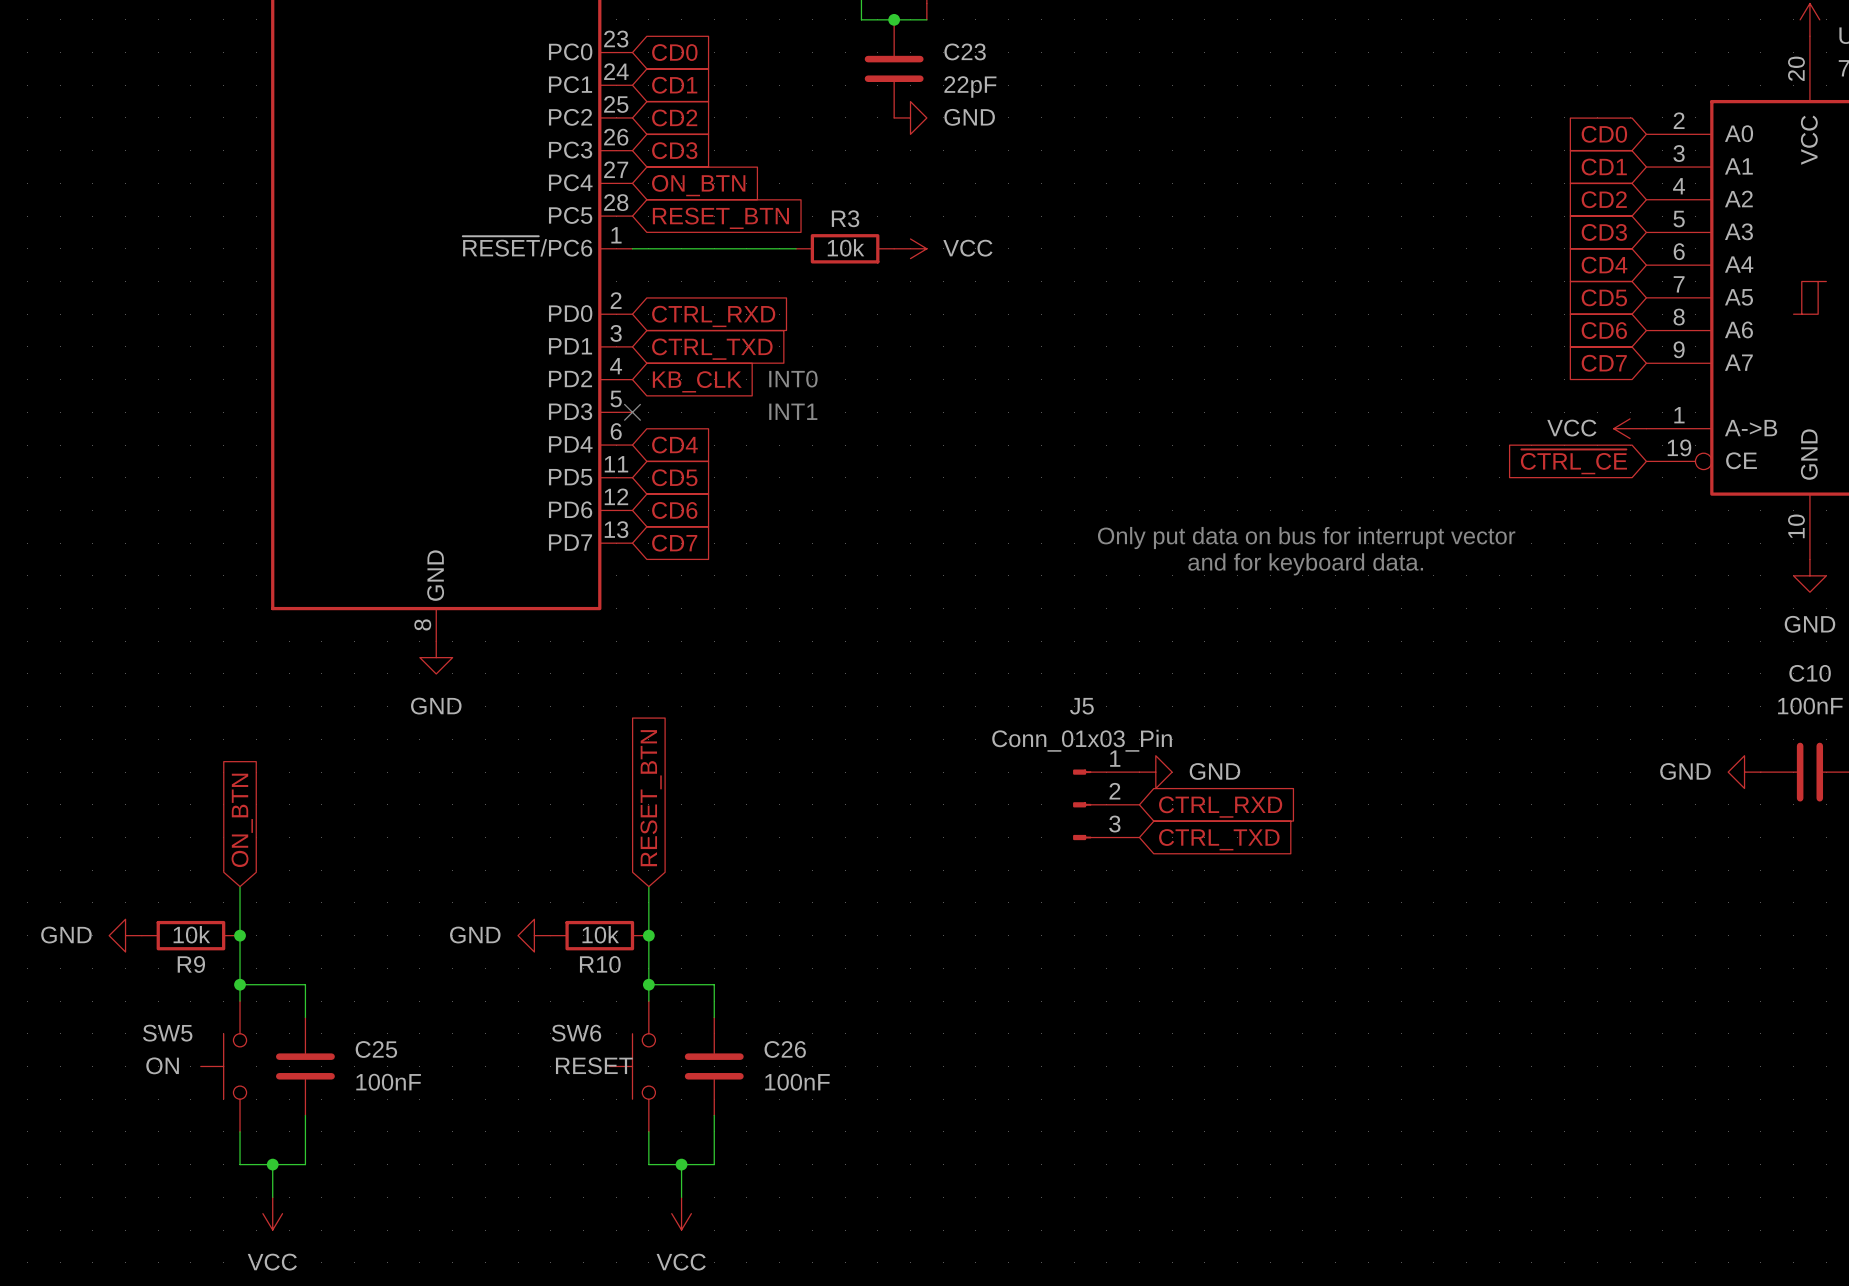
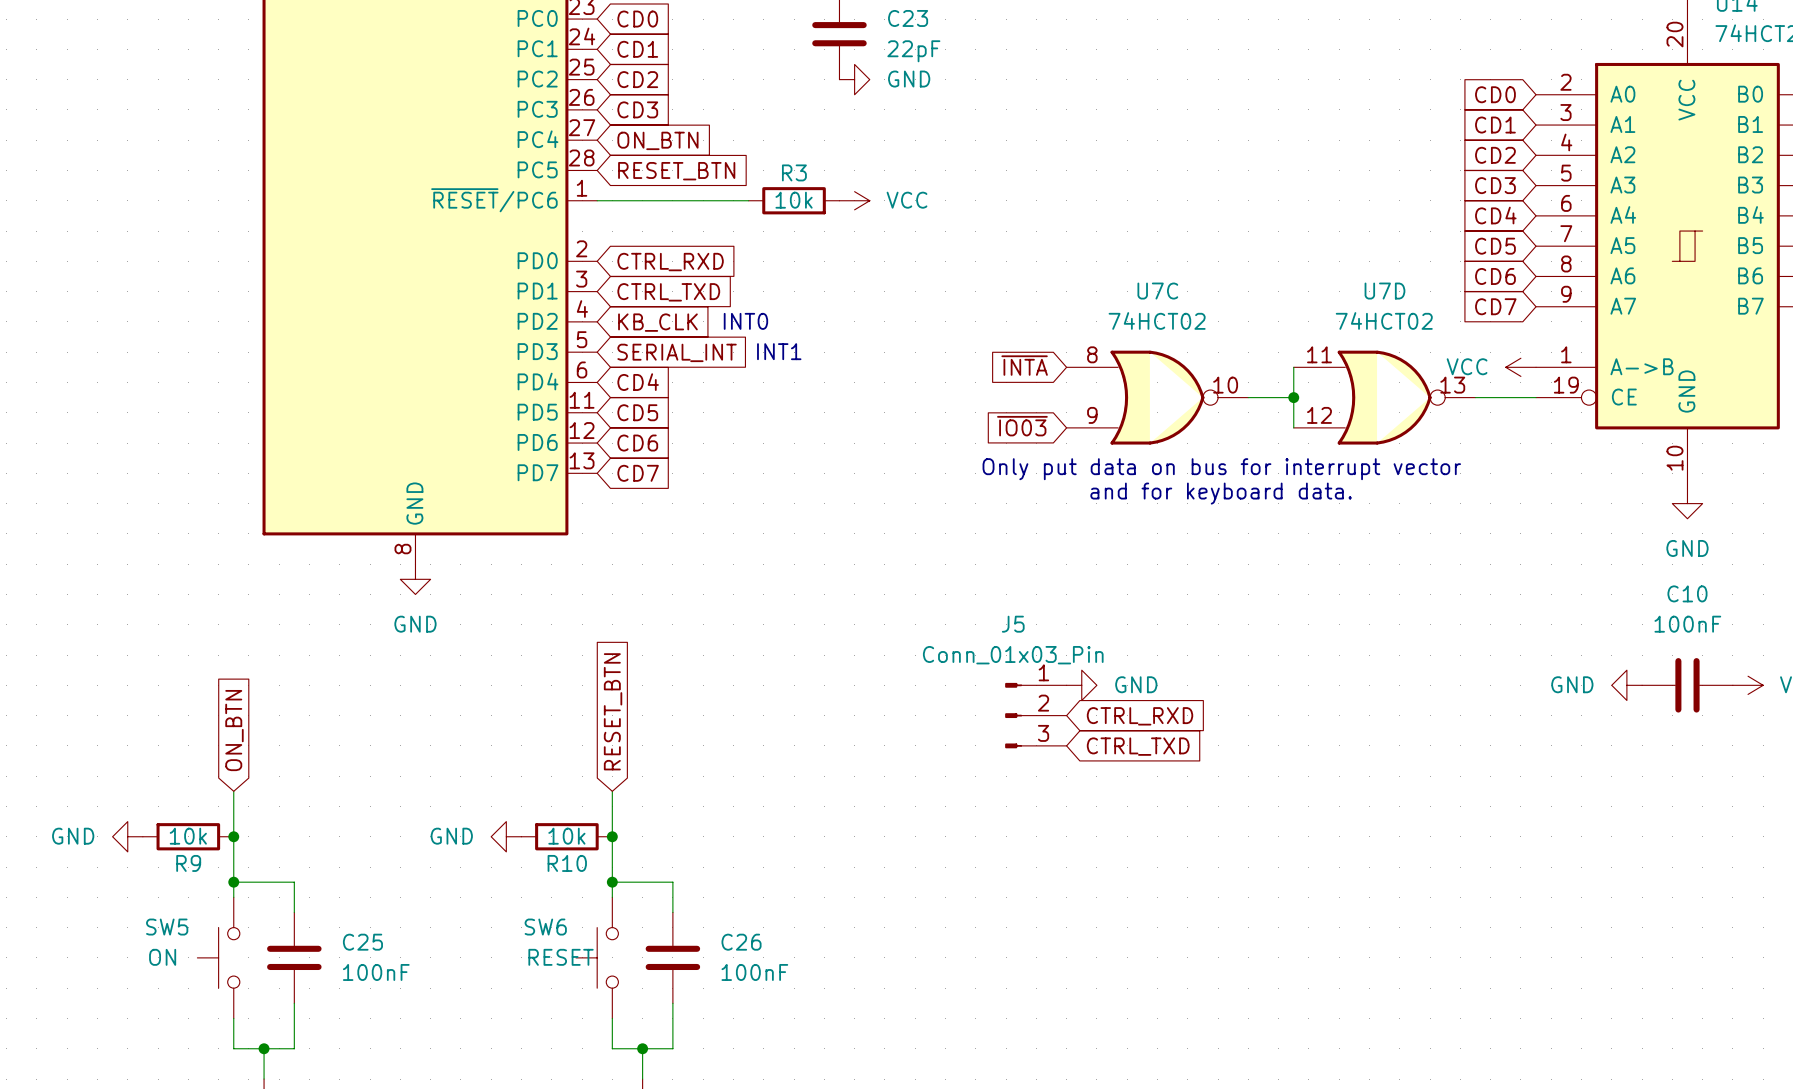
text position: INT1 (793, 411) -> INT1 (779, 351)
no-connect mark: (632, 412) -> none
global label: none -> SERIAL_INT (677, 352)
global label: none -> ~{INTA} (1024, 365)
wire: none -> (1293, 367) (1293, 427)
U7C: none -> 74HCT02 (1157, 397)
wire: none -> (1248, 397) (1293, 397)
junction: none -> (1293, 397)
U7D: none -> 74HCT02 (1384, 397)
global label: ~{CTRL_CE} (1573, 461) -> none
wire: none -> (1475, 397) (1536, 397)
global label: none -> ~{IO03} (1022, 426)

